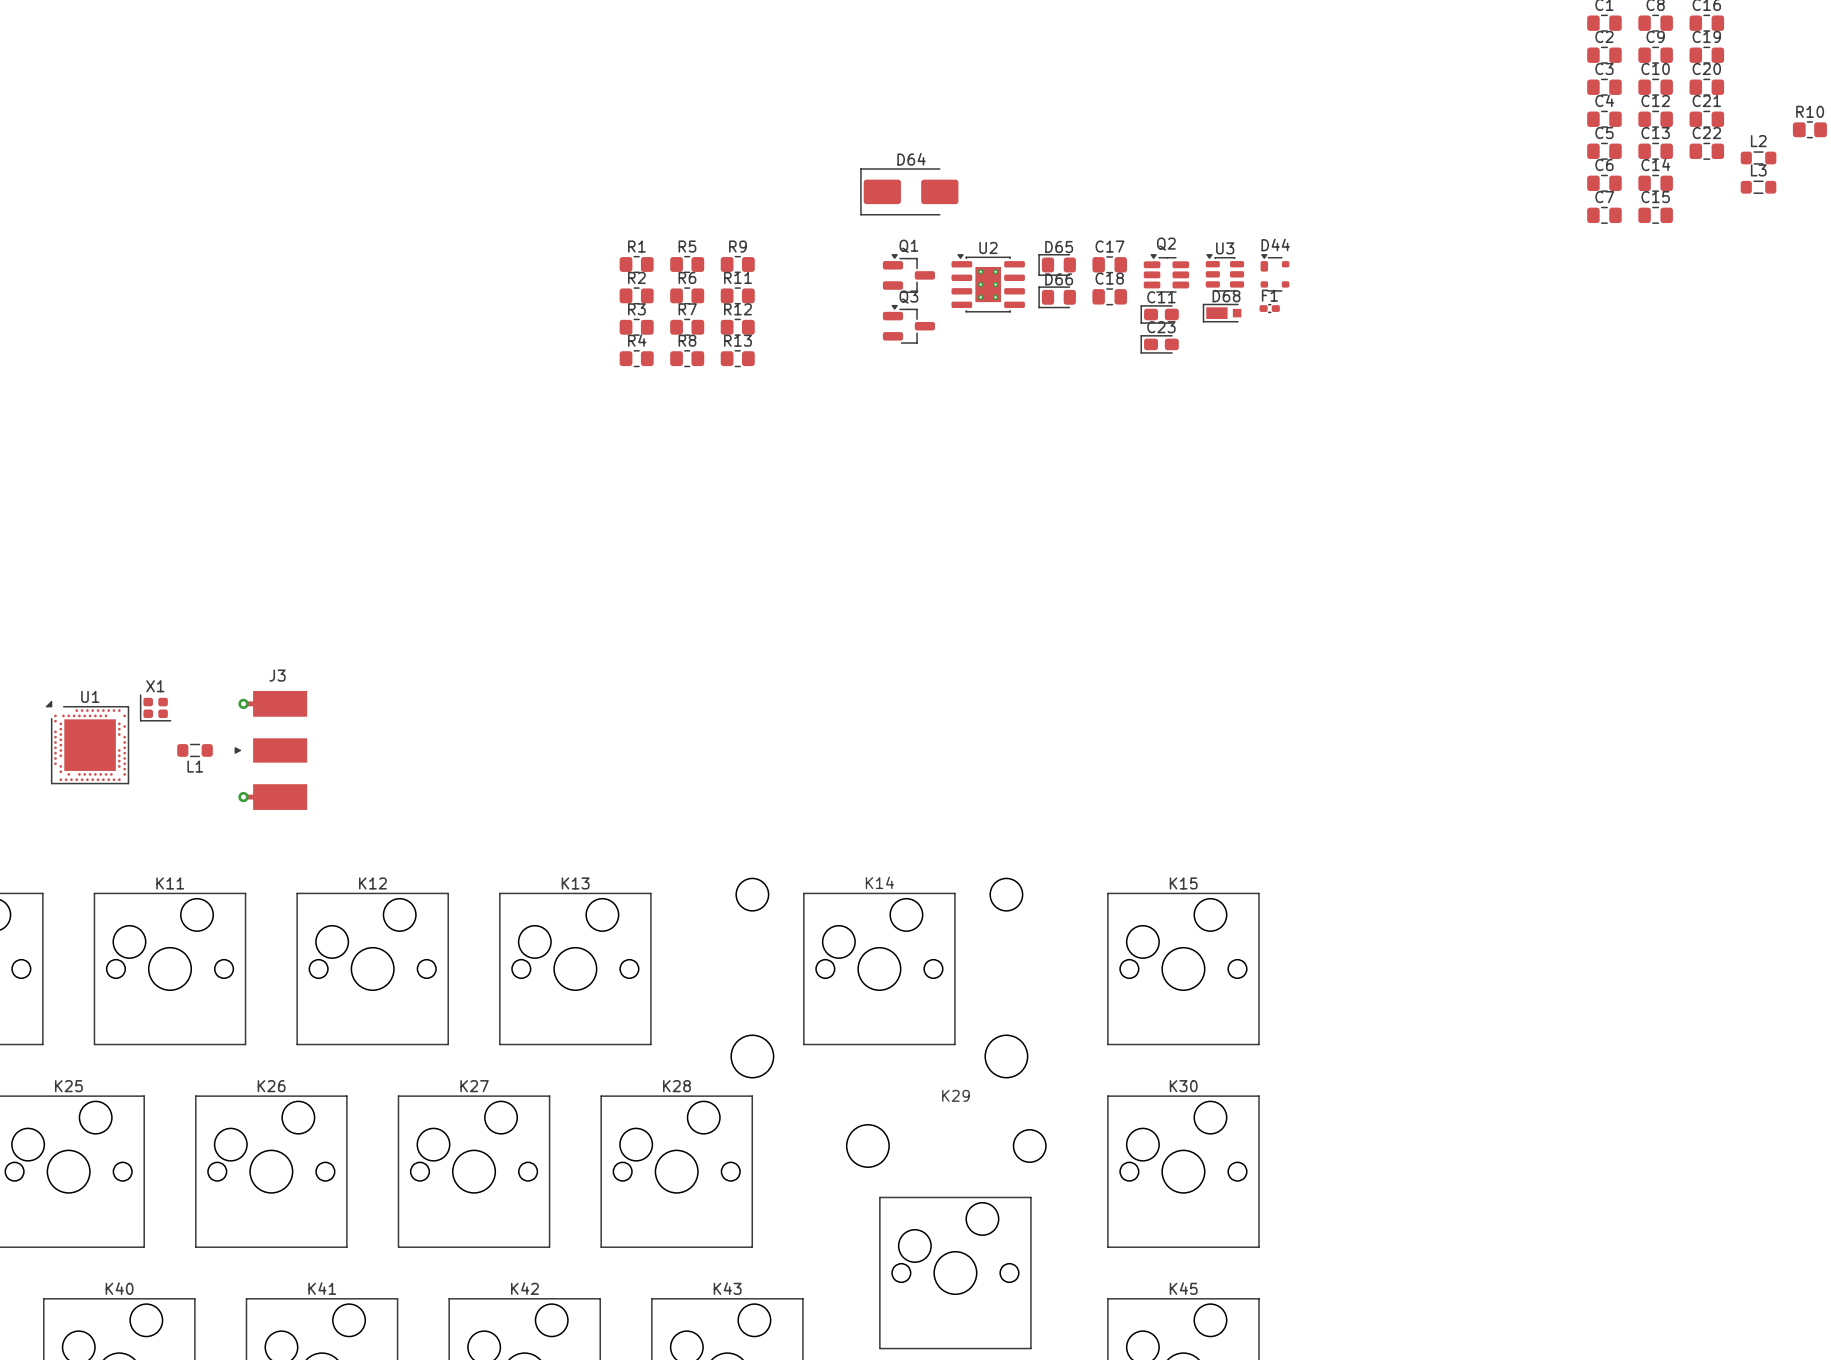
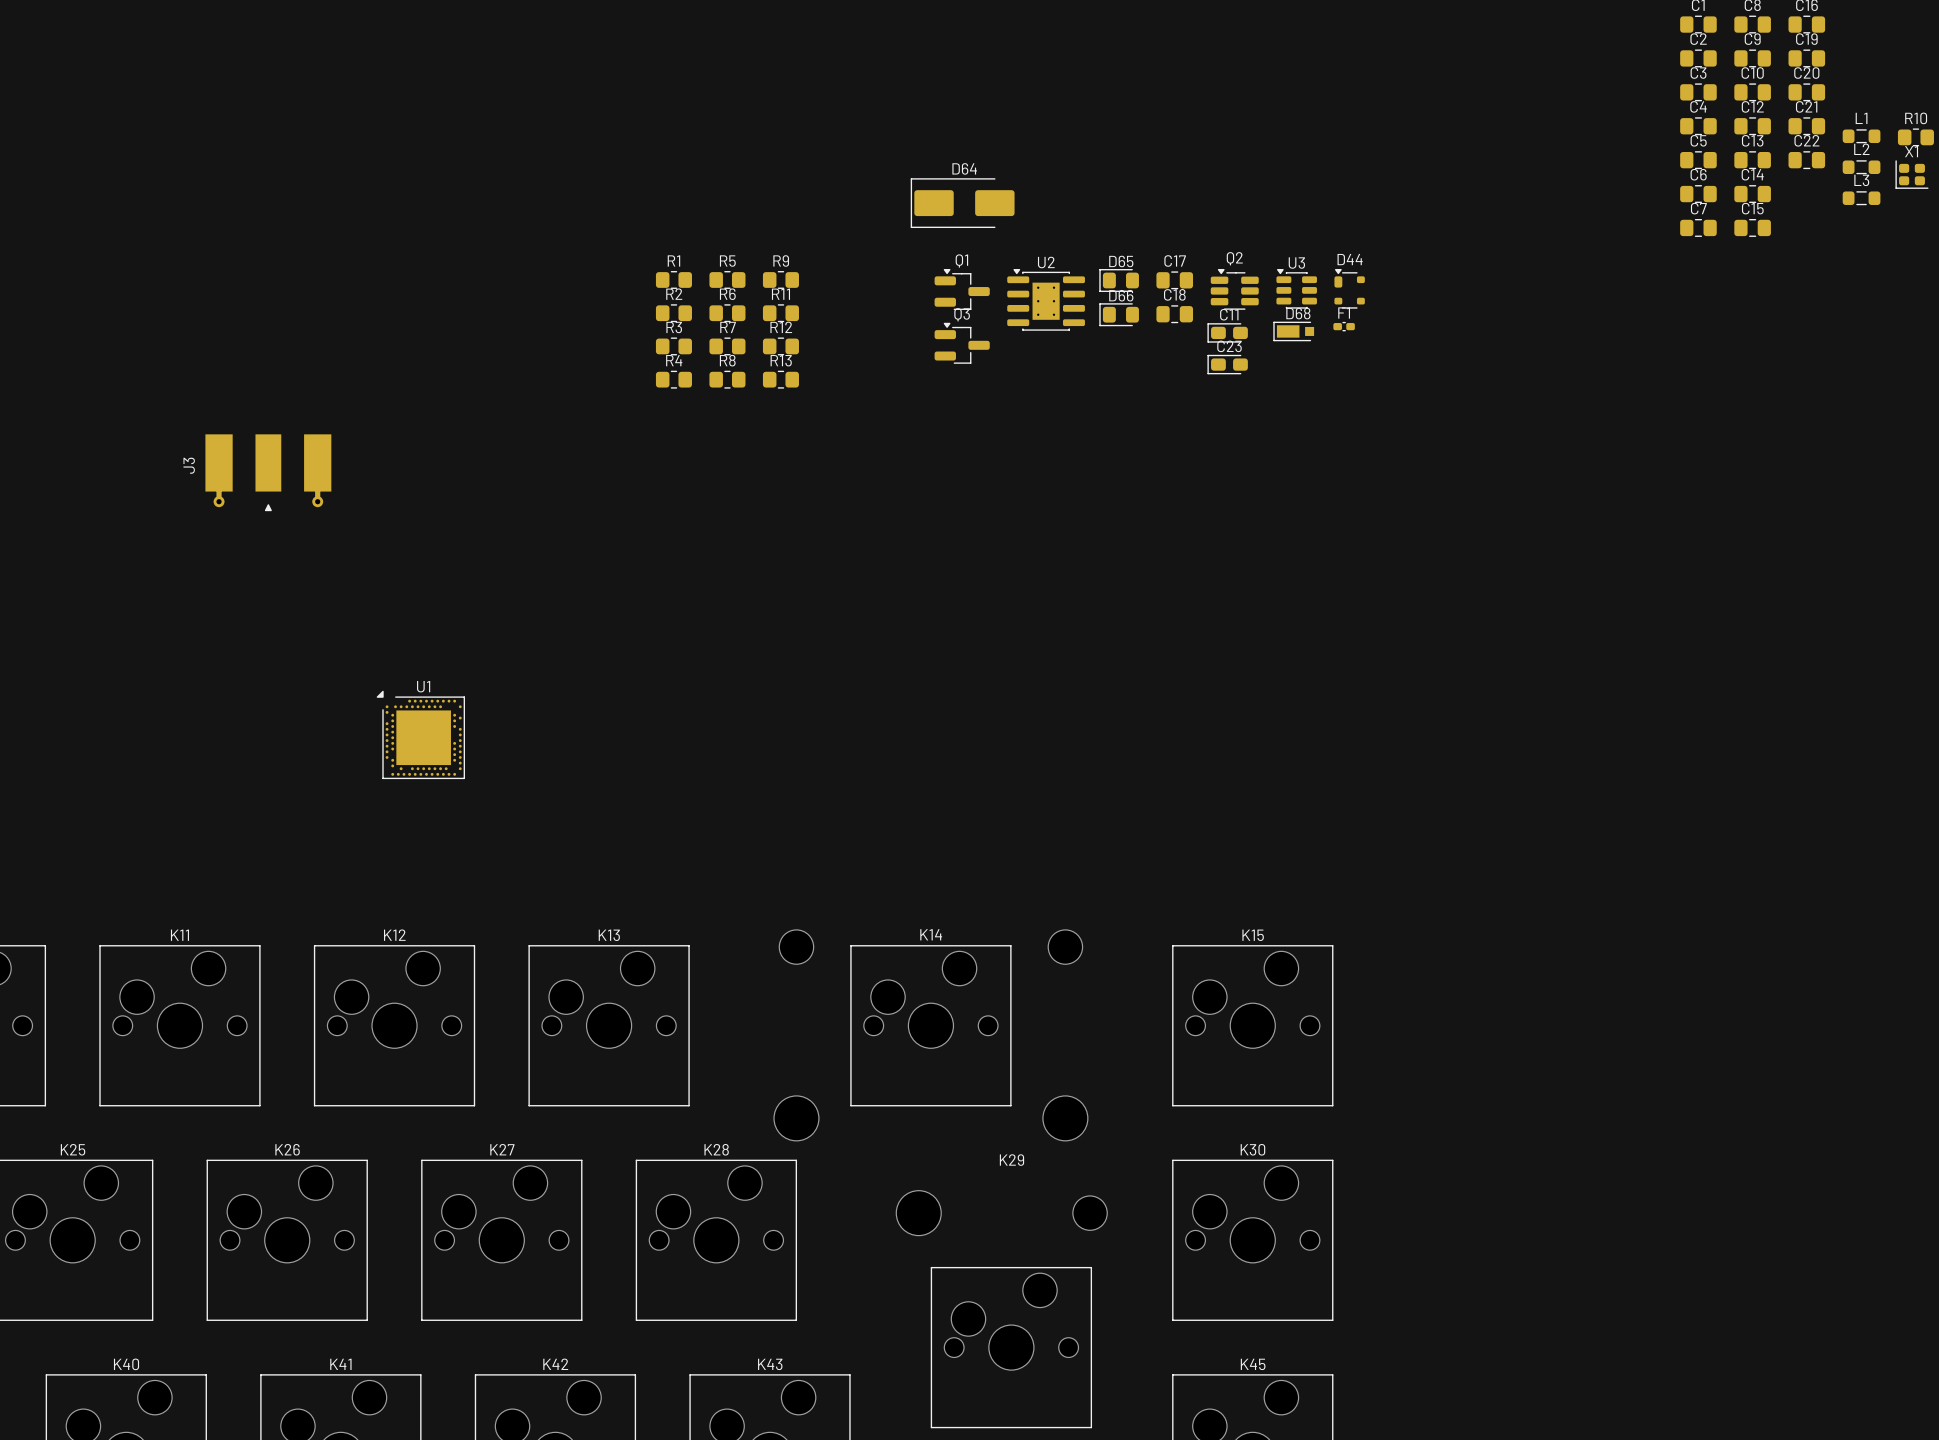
X1 position: (155, 707) -> (1912, 174)
U1 position: (87, 742) -> (420, 734)
L1 position: (195, 750) -> (1861, 136)
J3 rotation: 0° (270, 750) -> 90° counterclockwise (268, 472)
J3 position: (270, 750) -> (268, 472)
L1 name position: L1 (195, 766) -> L1 (1861, 118)

